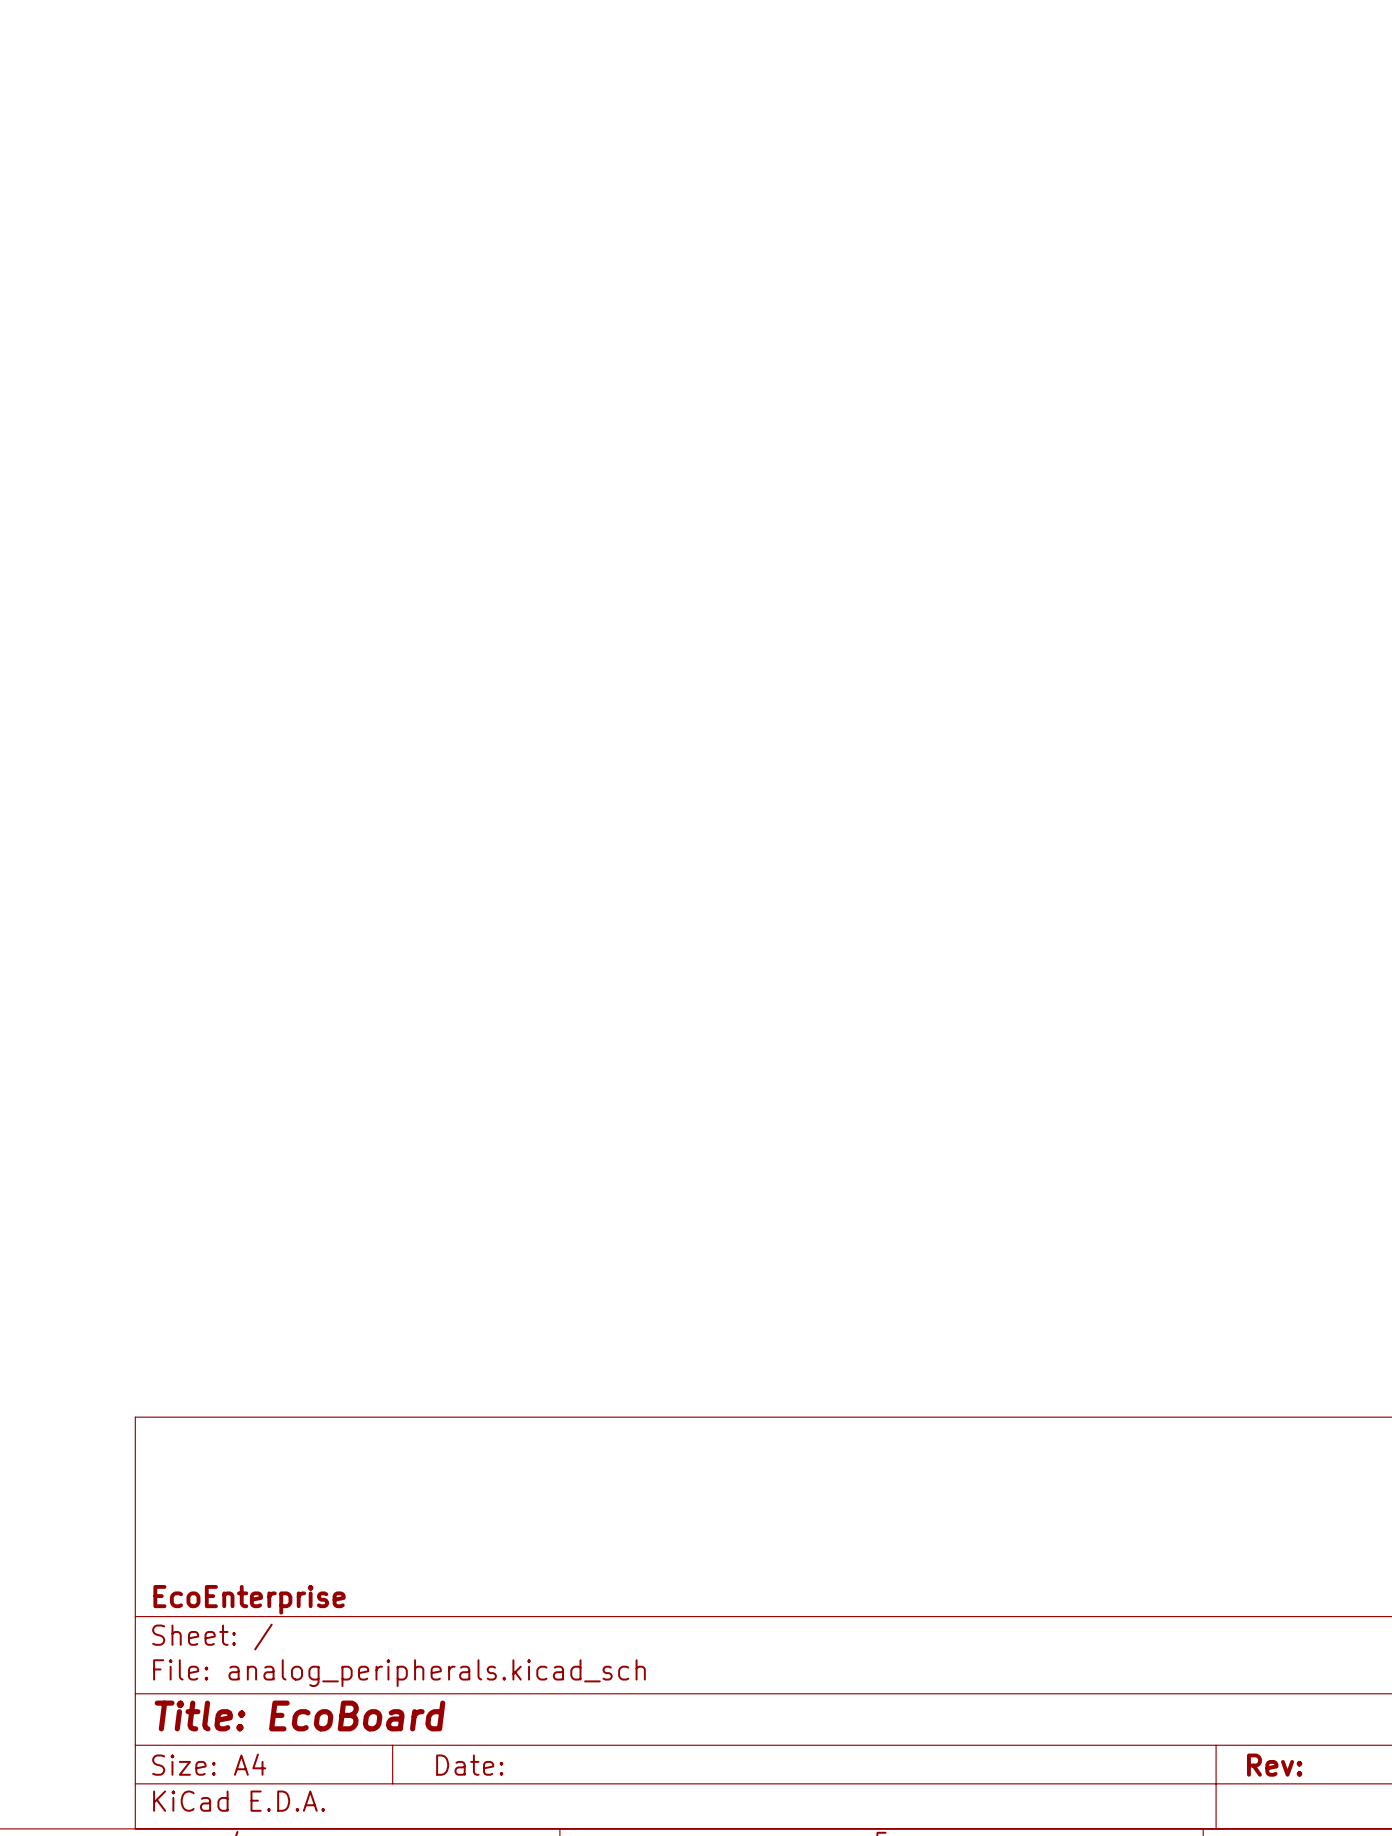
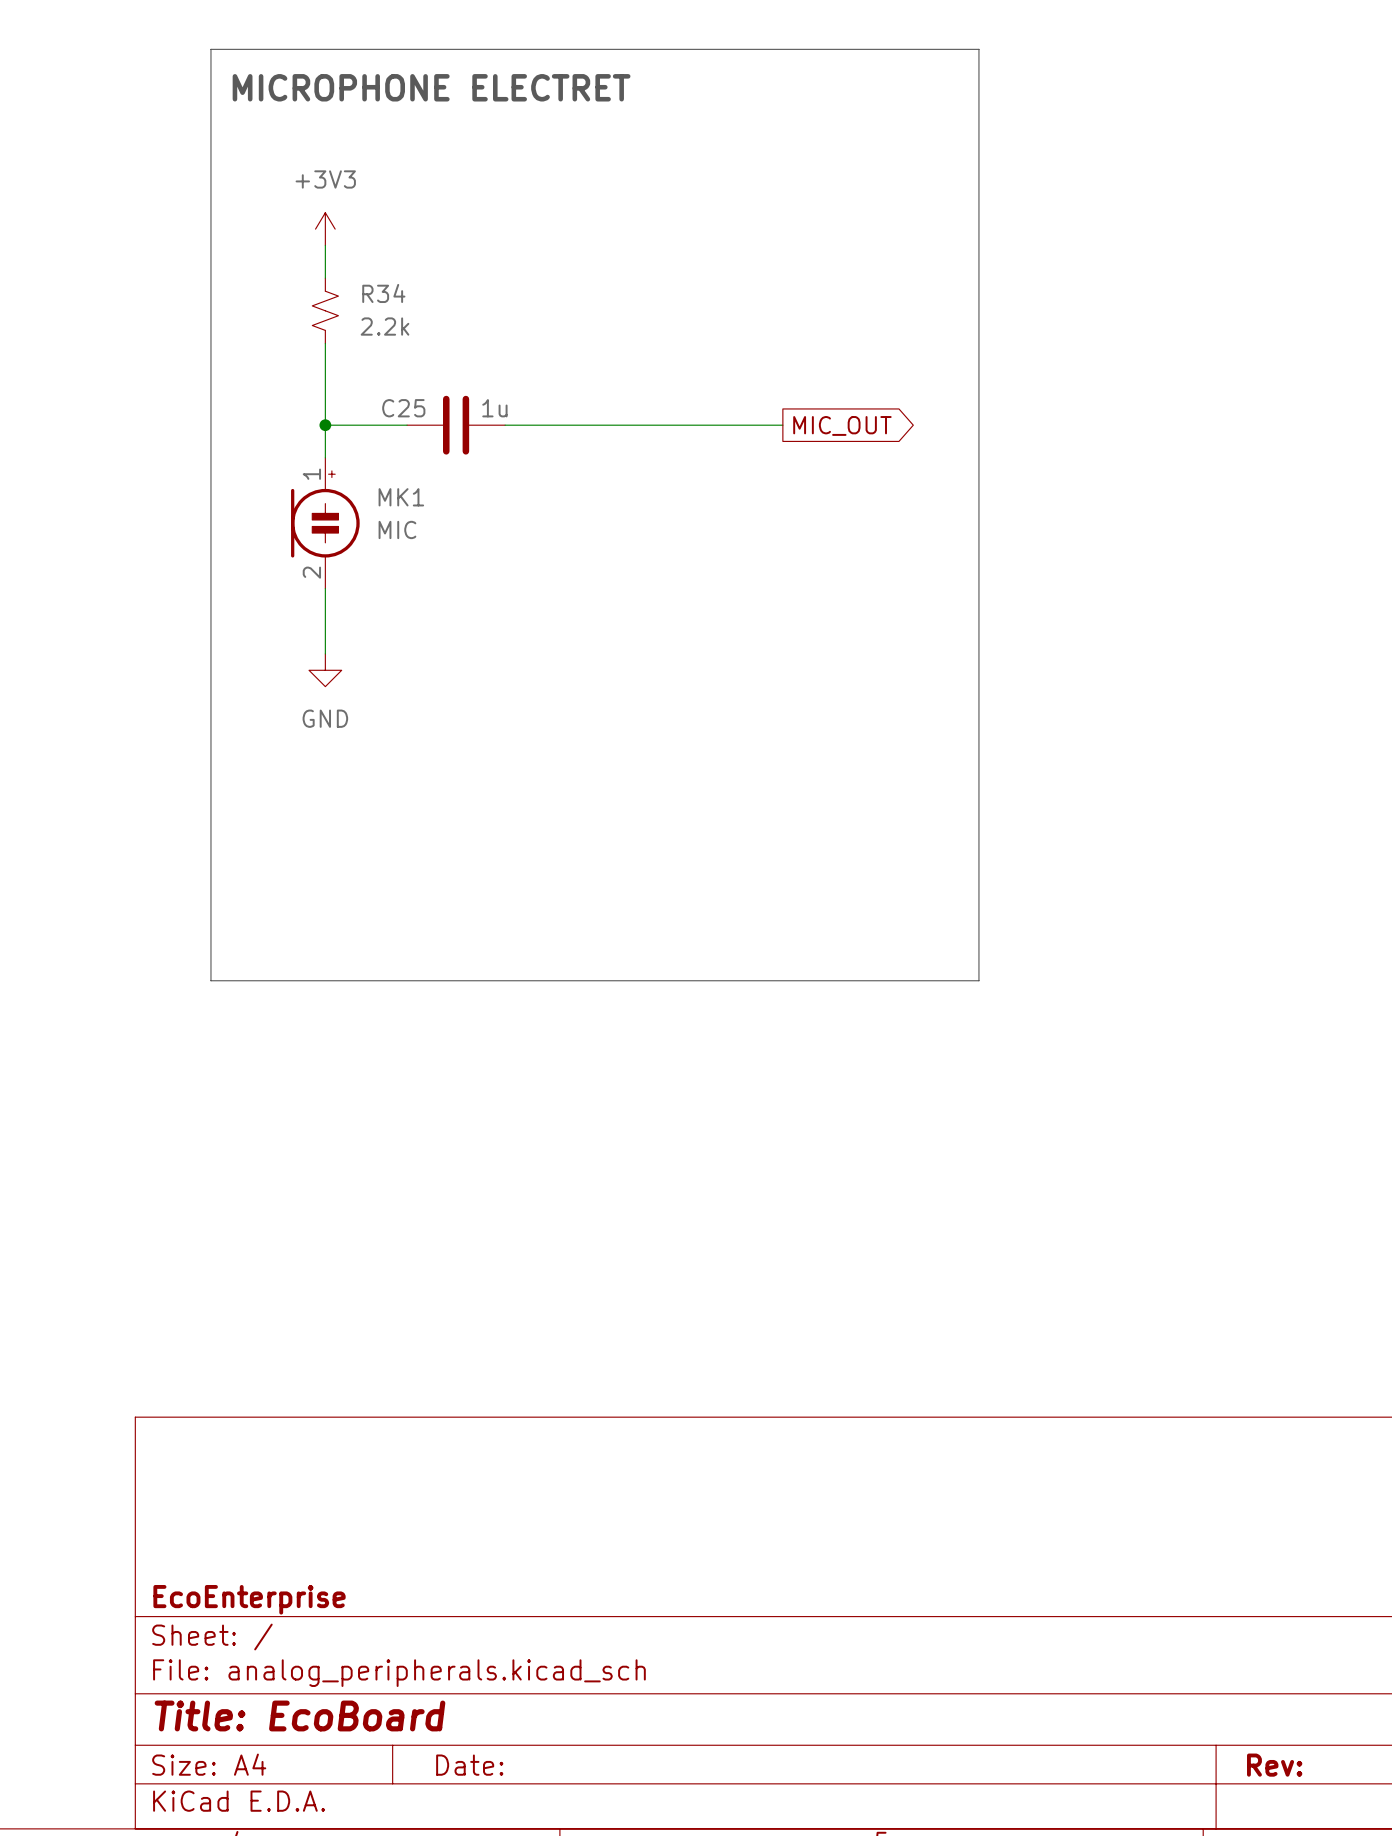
line: none -> (210, 49) (978, 49) (978, 980) (210, 980) (210, 49)
text: none -> MICROPHONE ELECTRET (431, 87)
power symbol: none -> +3V3 (325, 229)
wire: none -> (325, 245) (325, 278)
R34: none -> 2.2k (325, 310)
wire: none -> (325, 343) (325, 457)
wire: none -> (325, 425) (407, 425)
junction: none -> (325, 425)
C25: none -> 1u (456, 425)
wire: none -> (505, 425) (782, 425)
global label: none -> MIC_OUT (842, 425)
MK1: none -> MIC (325, 523)
wire: none -> (325, 588) (325, 653)
power symbol: none -> GND (325, 670)

